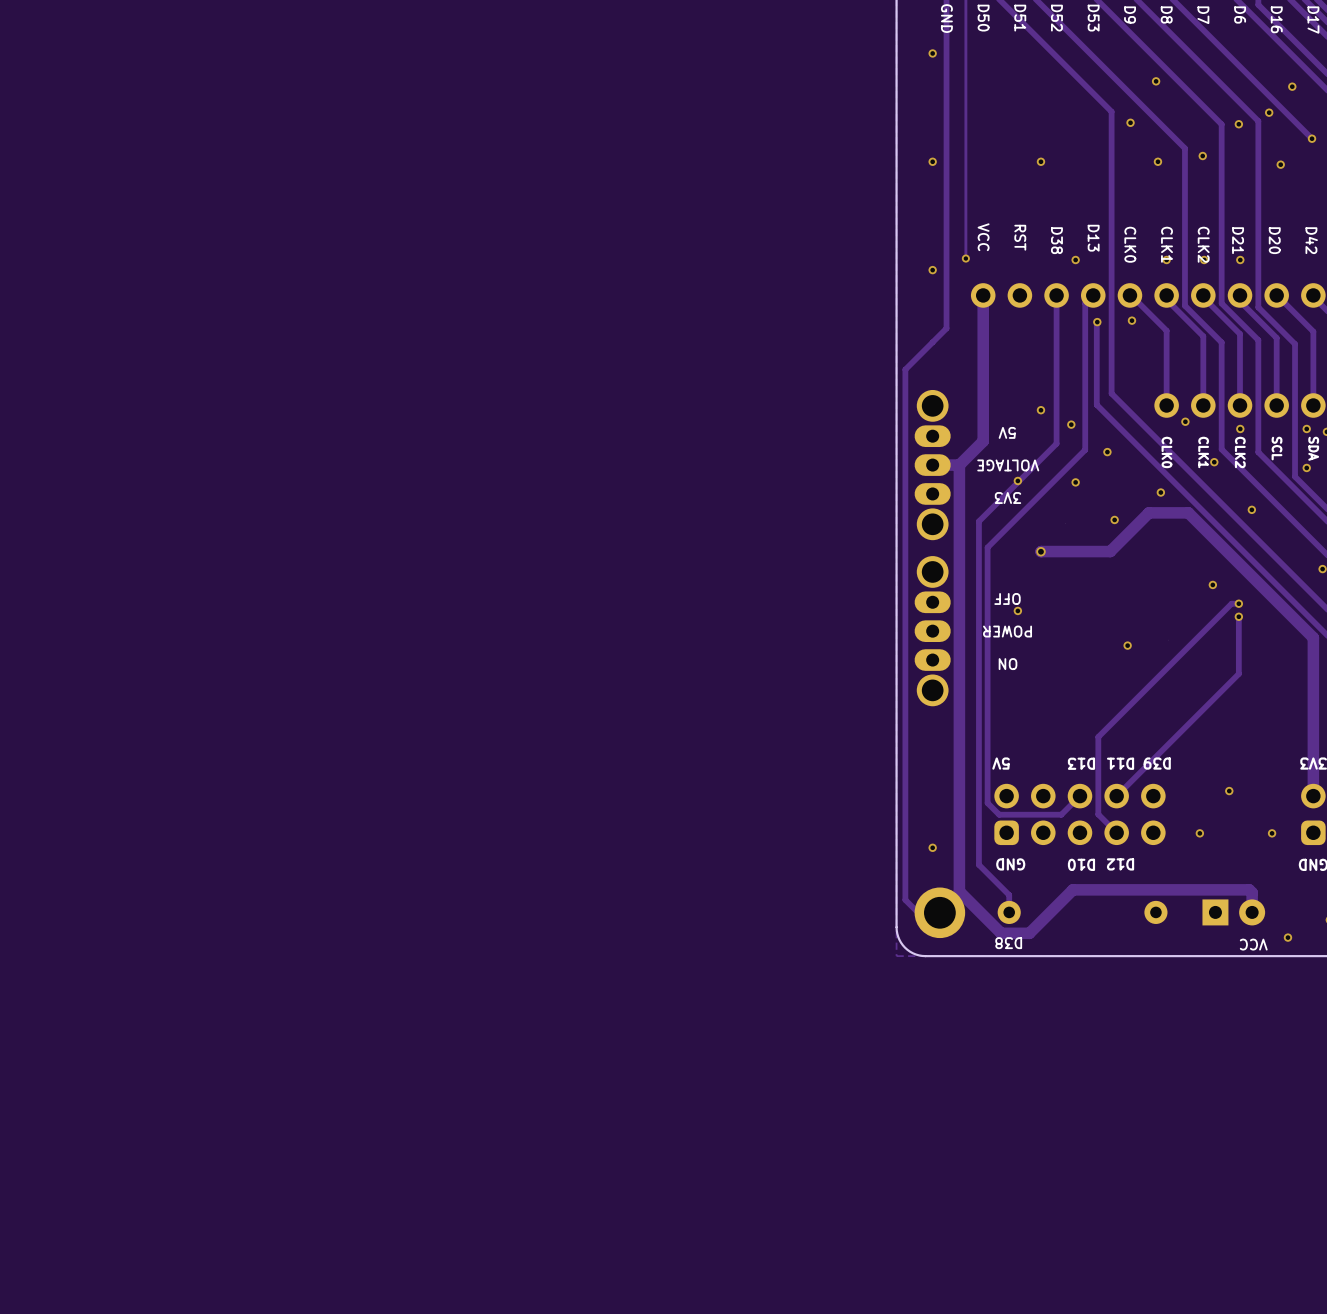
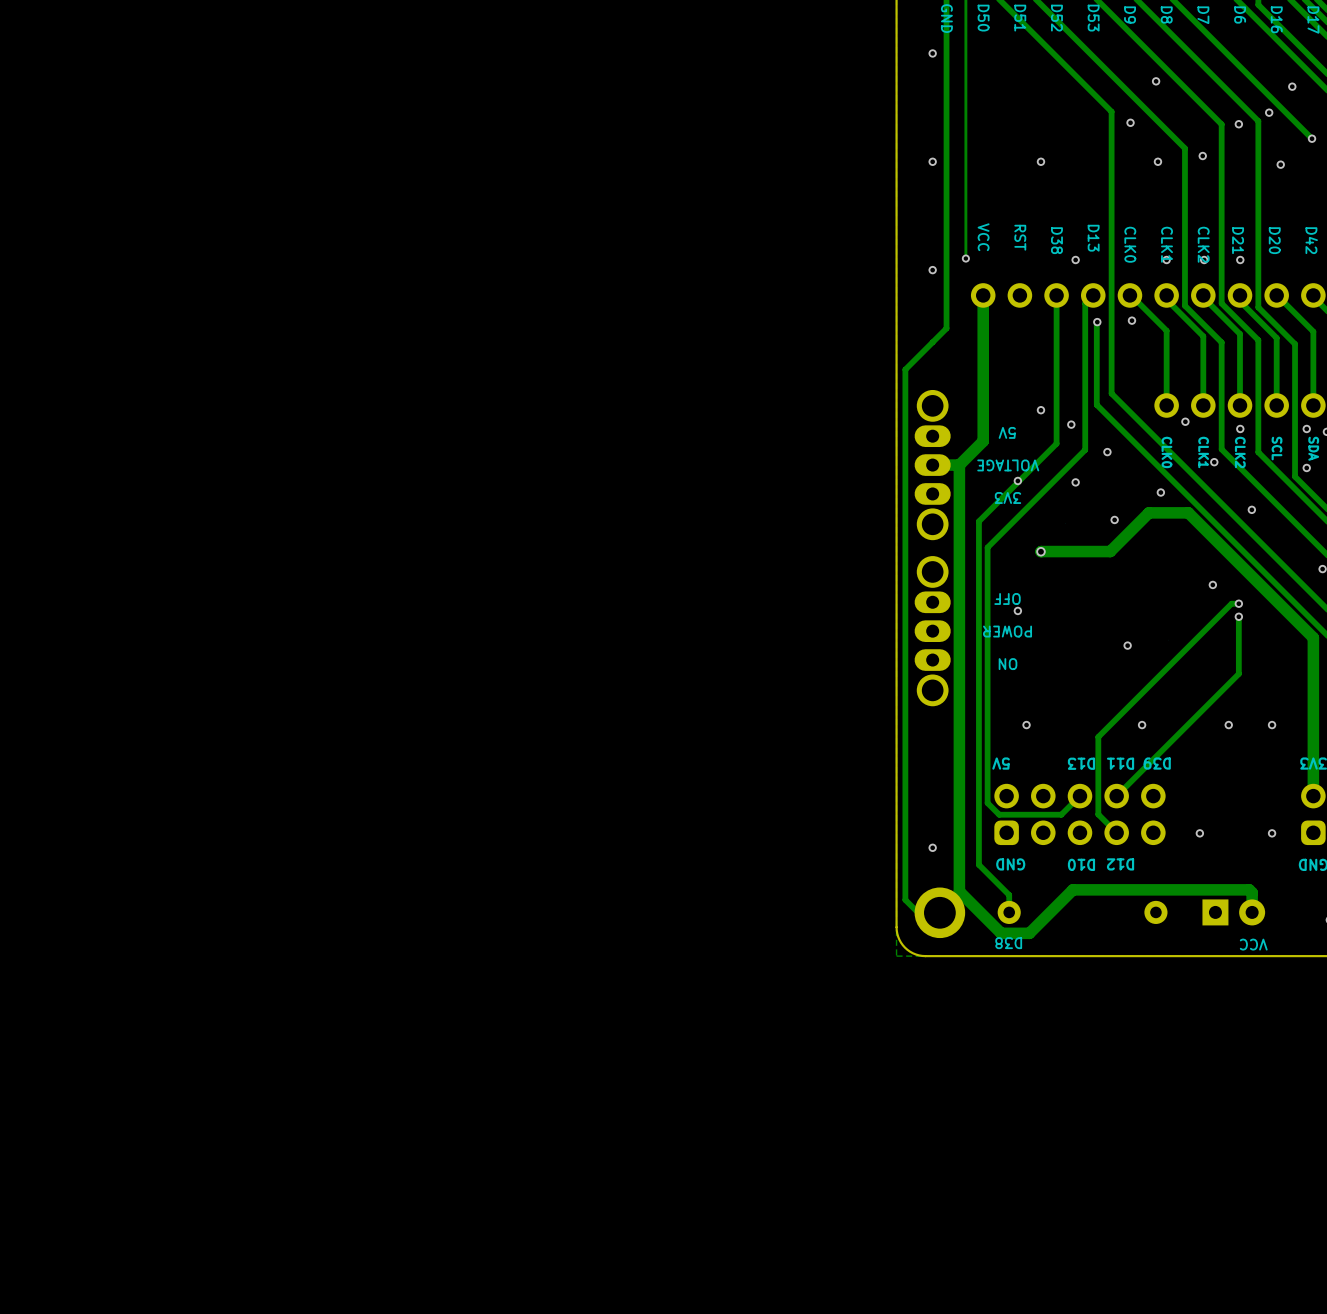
via: none -> (1026, 725)
via: none -> (1142, 725)
via: none -> (1228, 725)
via: none -> (1272, 725)
via: (1229, 791) -> none
via: (1287, 937) -> none

